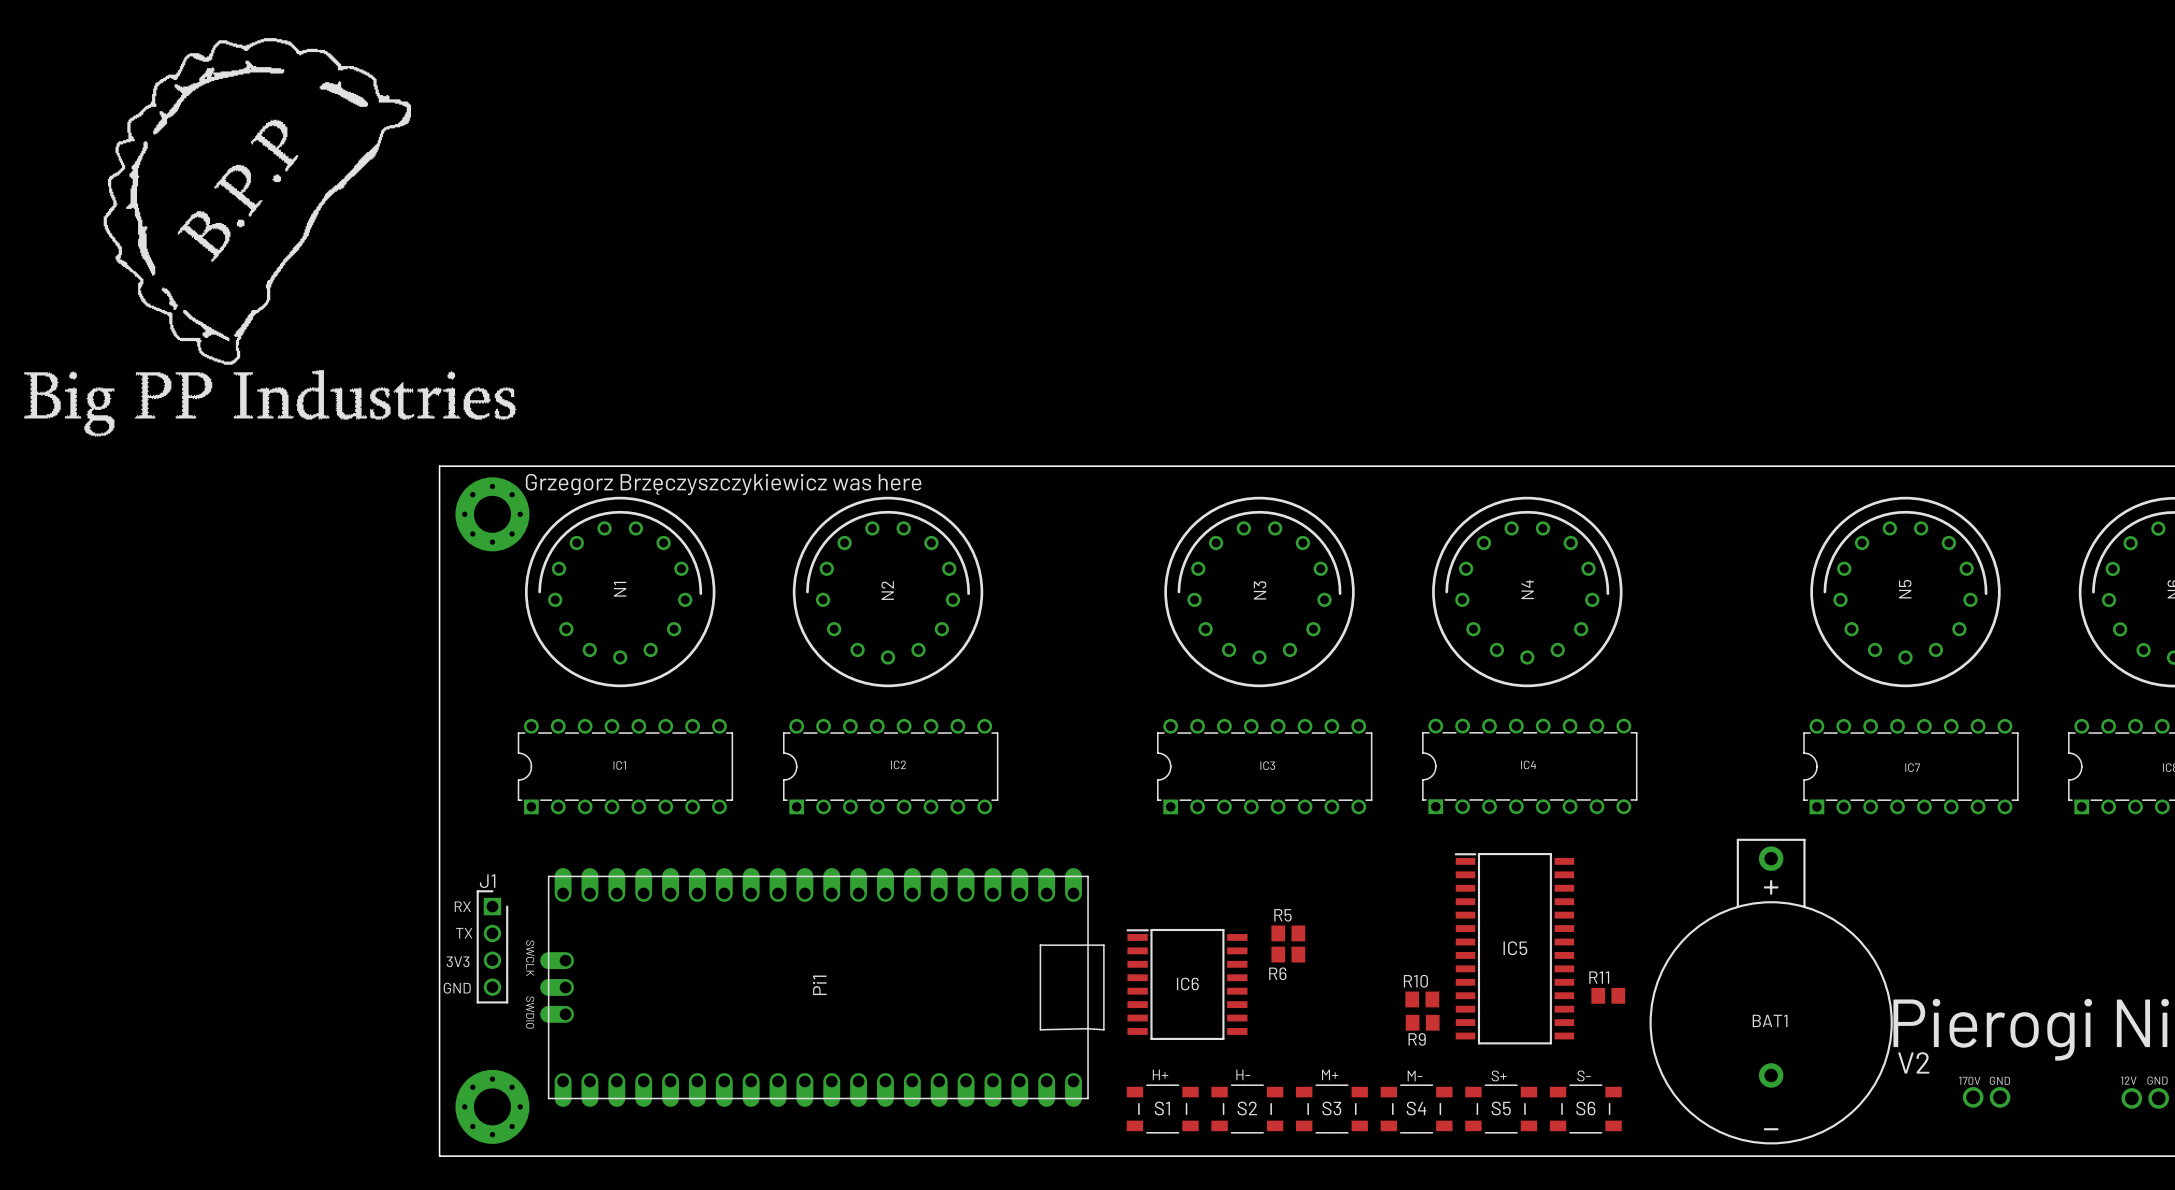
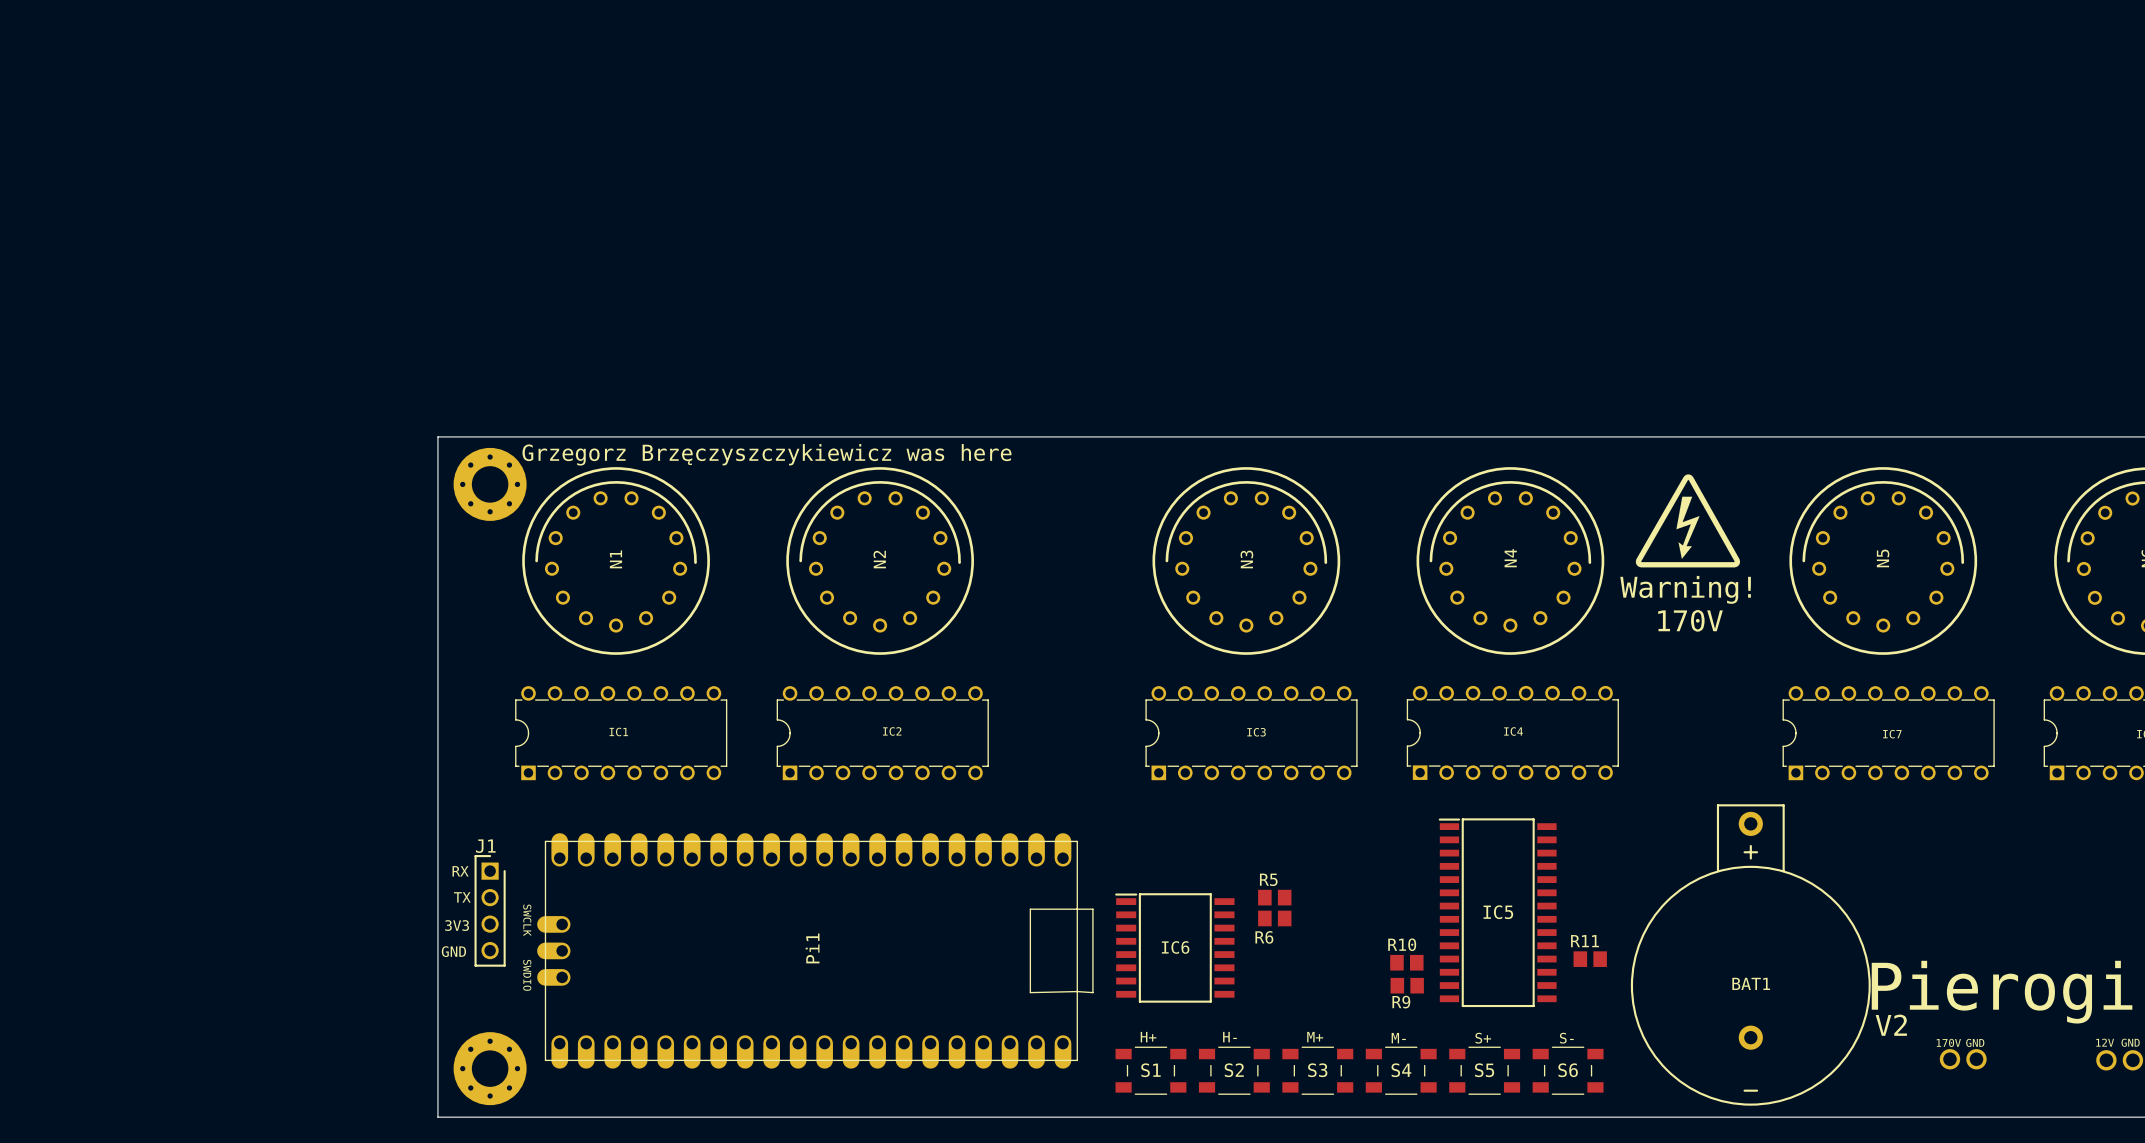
drawing: [24, 38, 517, 437] -> none
drawing: none -> [1635, 474, 1740, 568]
text: none -> Warning! (1685, 589)
text: none -> 170V (1690, 620)

